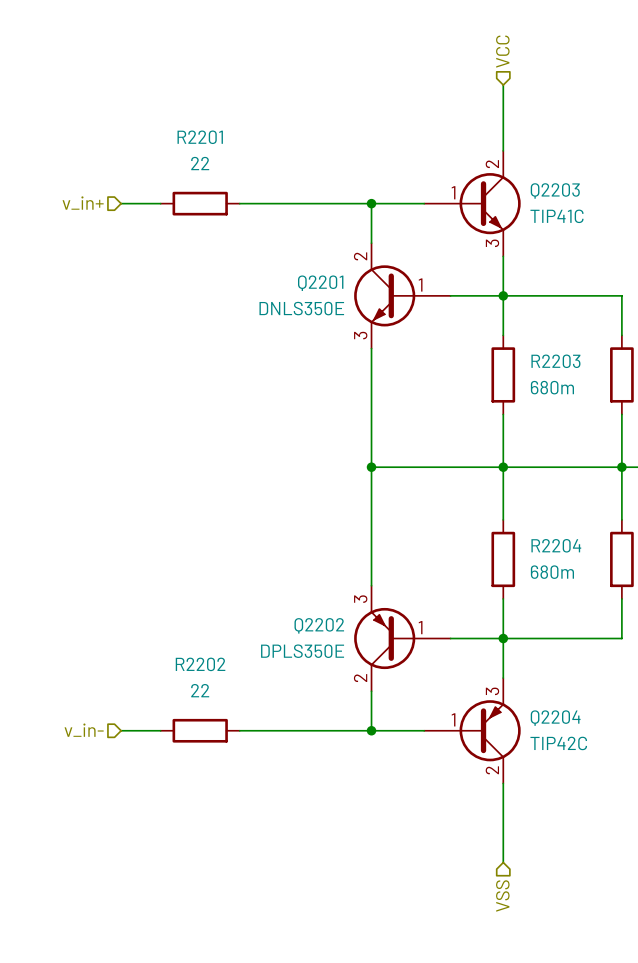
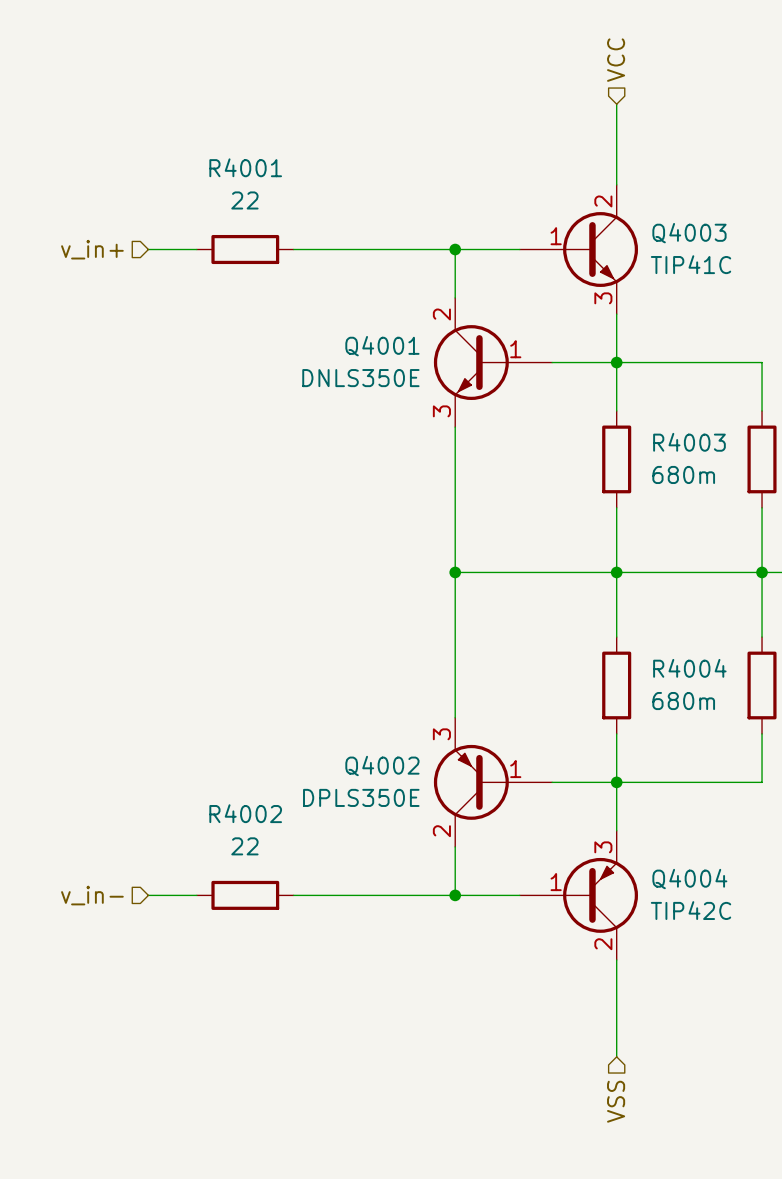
R2201 name: R2201 (200, 137) -> R4001 (245, 167)
Q2203 name: Q2203 (555, 190) -> Q4003 (689, 233)
Q2201 name: Q2201 (320, 283) -> Q4001 (382, 346)
R2203 name: R2203 (555, 361) -> R4003 (689, 442)
R2204 name: R2204 (556, 545) -> R4004 (689, 668)
Q2202 name: Q2202 (319, 625) -> Q4002 (382, 766)
R2202 name: R2202 (200, 664) -> R4002 (245, 813)
Q2204 name: Q2204 (555, 718) -> Q4004 (689, 879)

